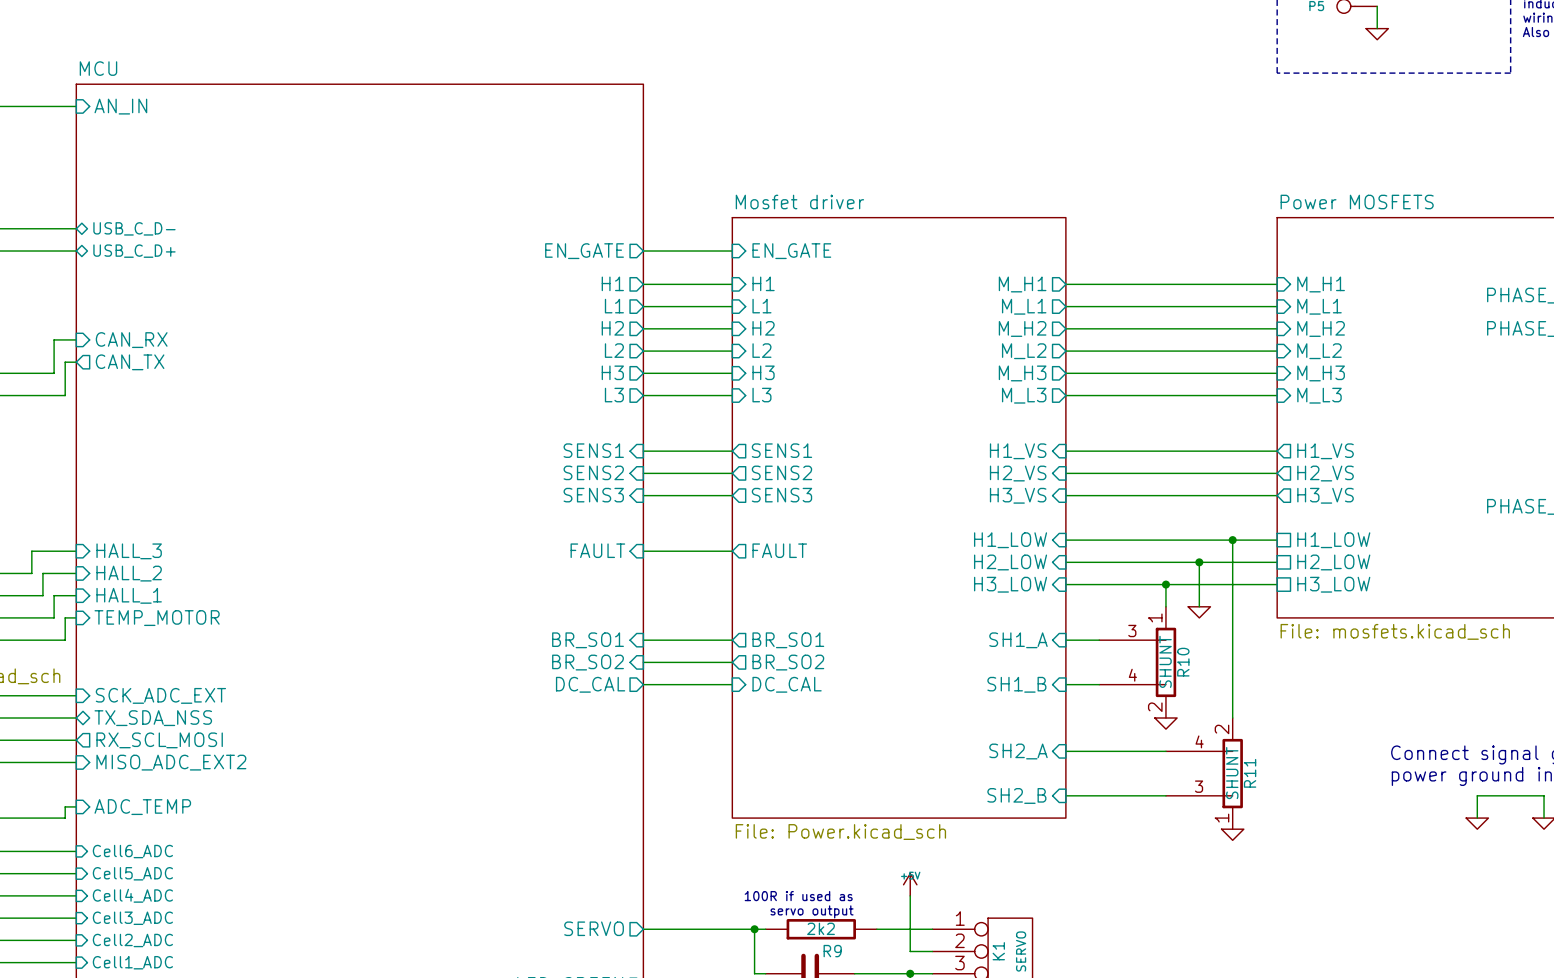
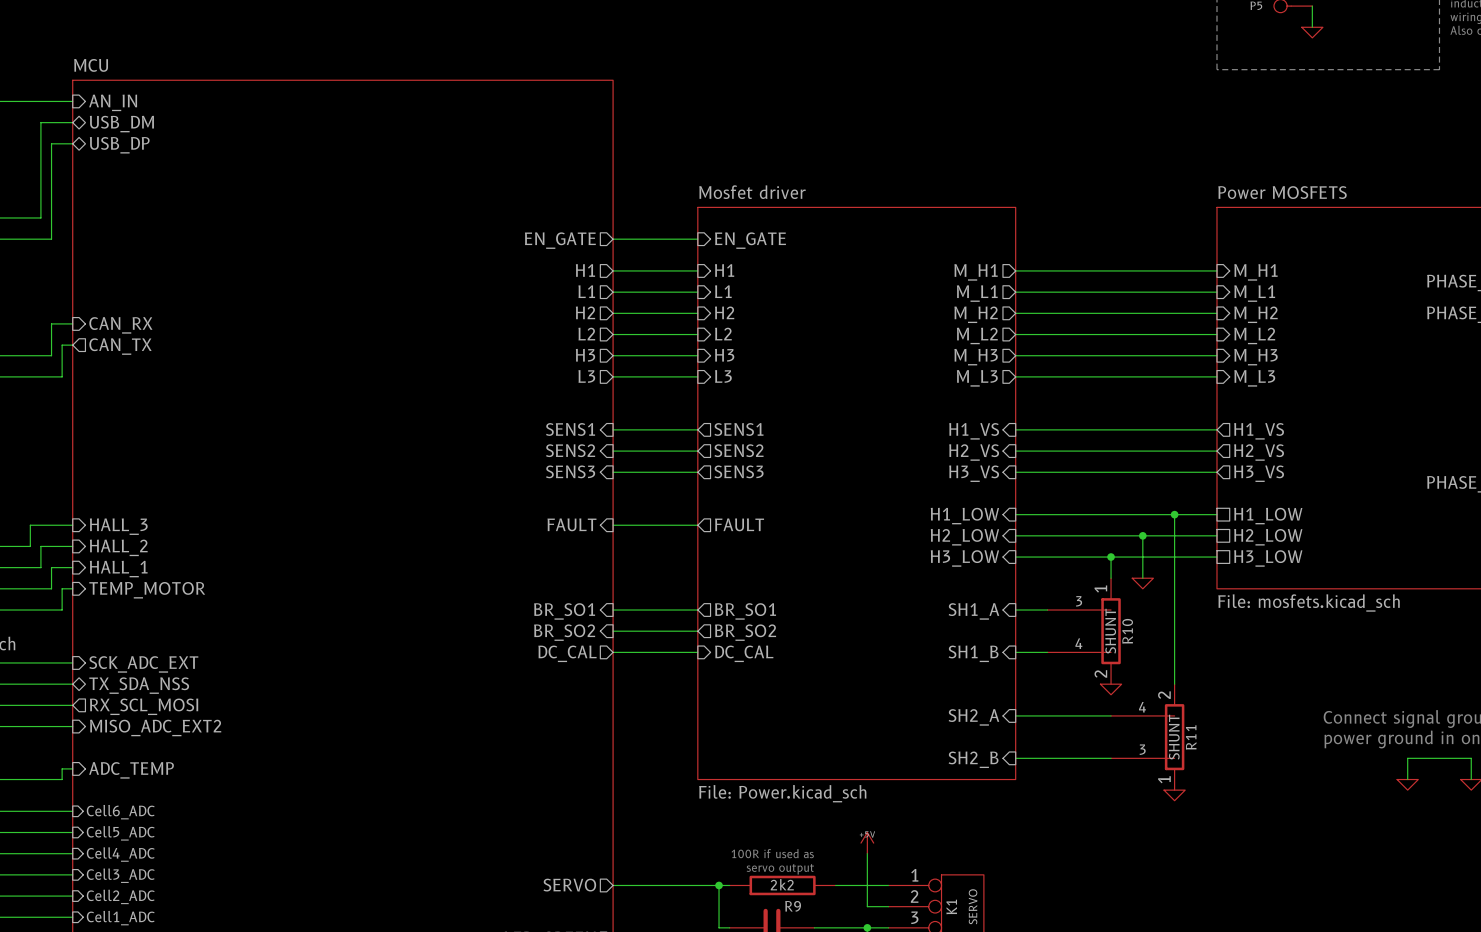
sheet pin: none -> USB_DM (121, 124)
sheet pin: none -> USB_DP (119, 145)
wire: (42, 228) (76, 228) -> (40, 217) (40, 122) (72, 122)
sheet pin: USB_C_D- (134, 228) -> none
wire: (54, 251) (76, 251) -> (51, 239) (51, 143) (72, 143)
sheet pin: USB_C_D+ (134, 251) -> none

